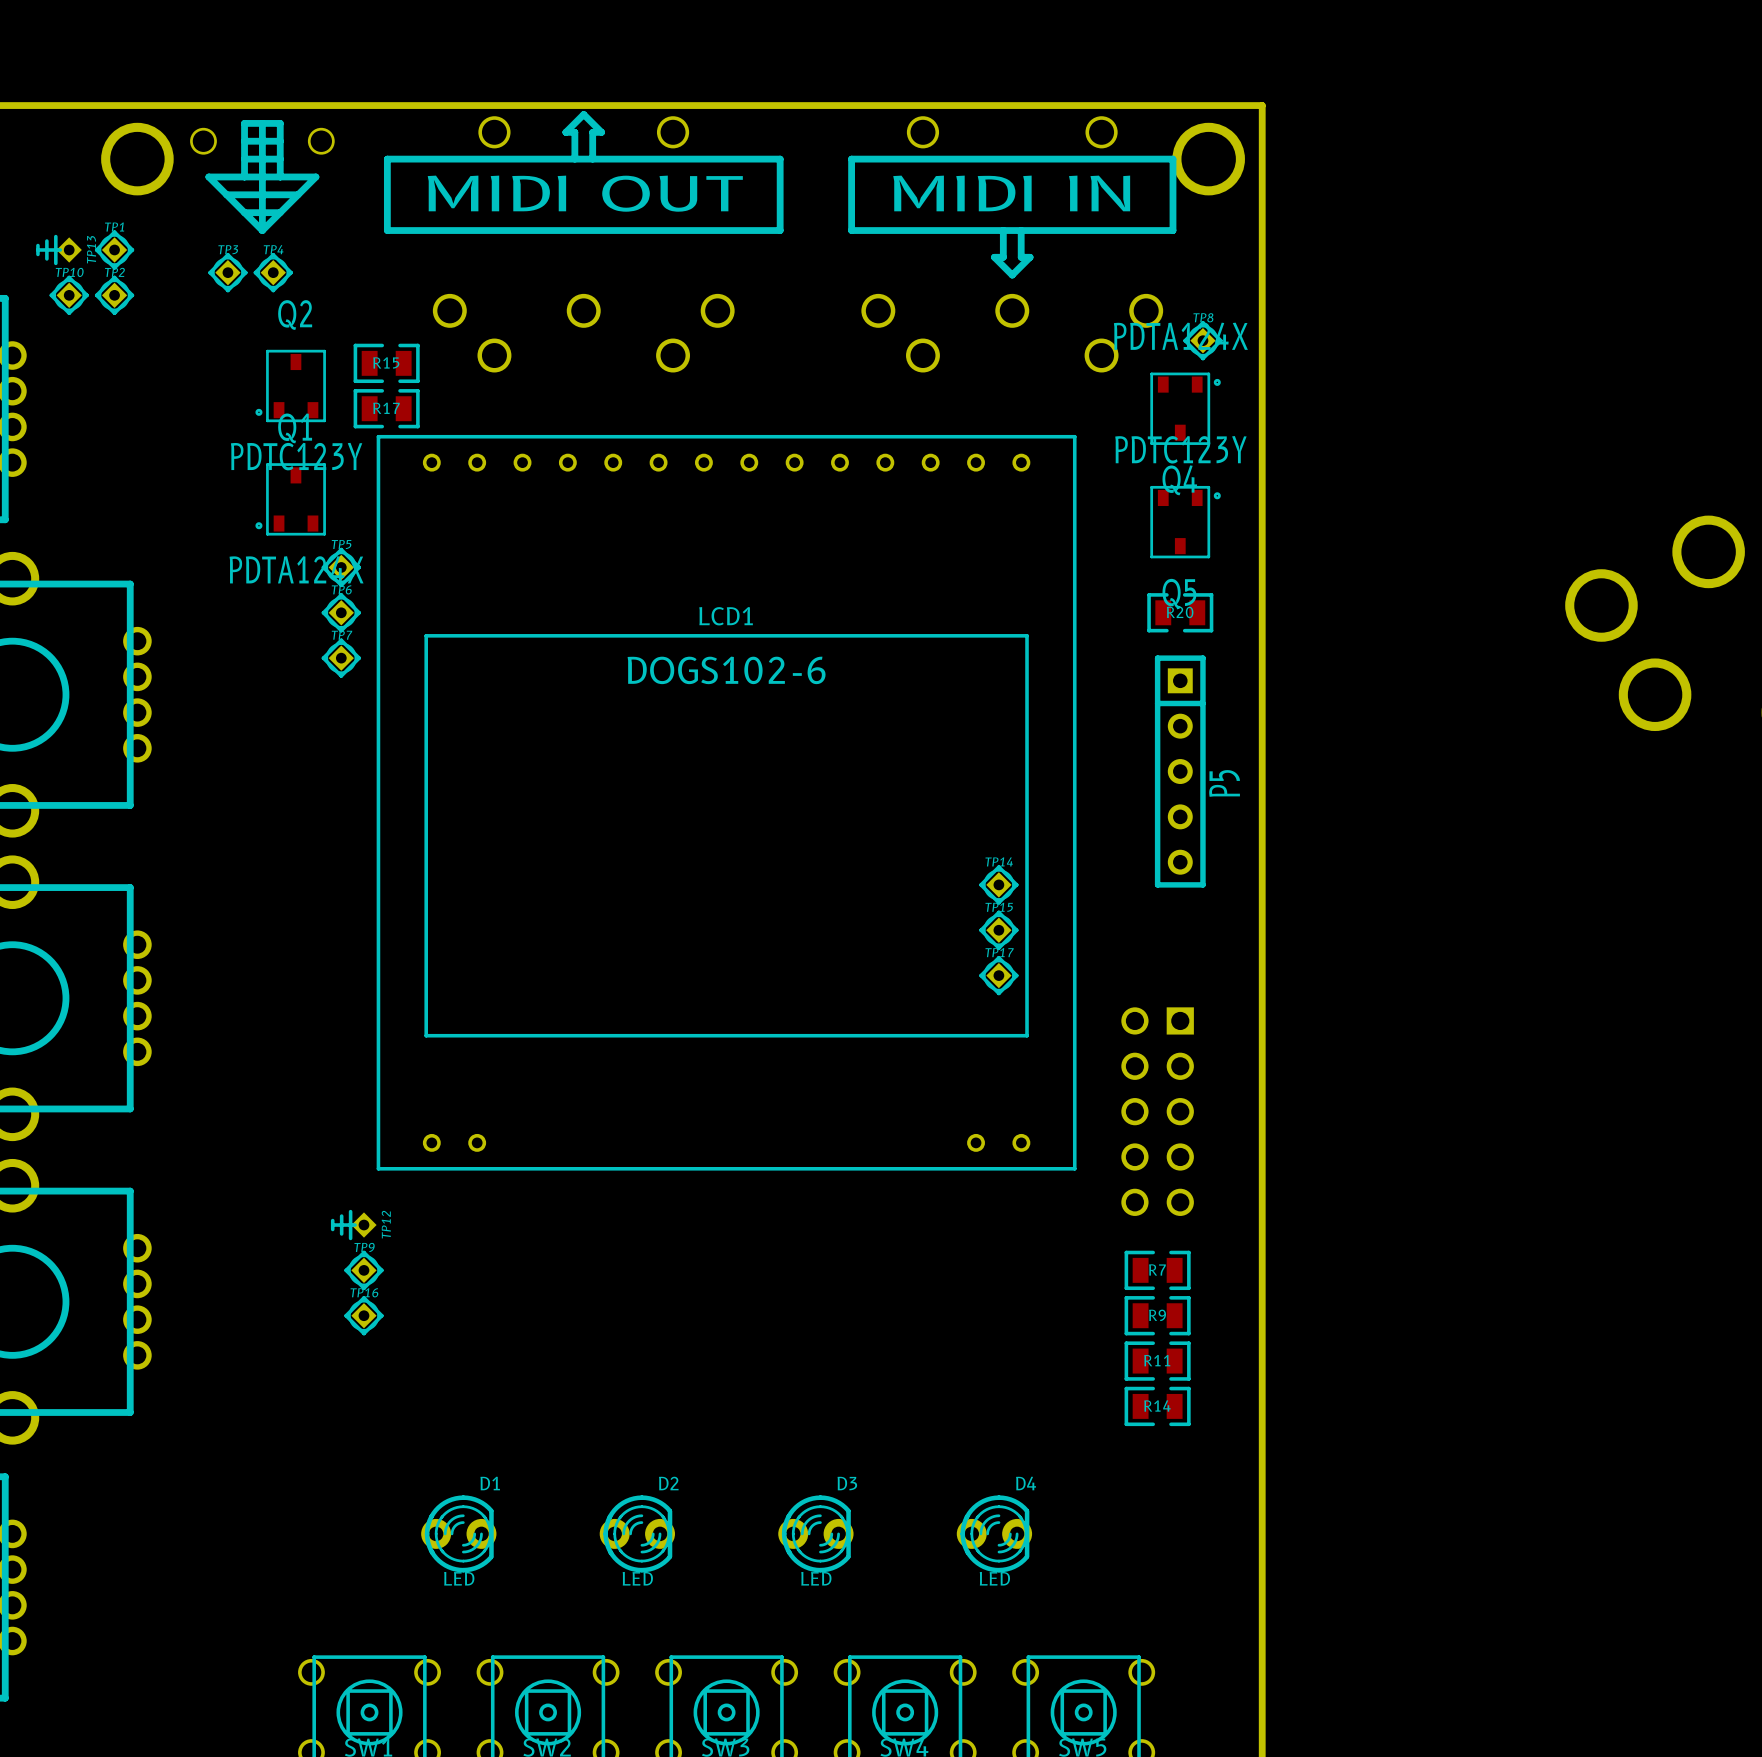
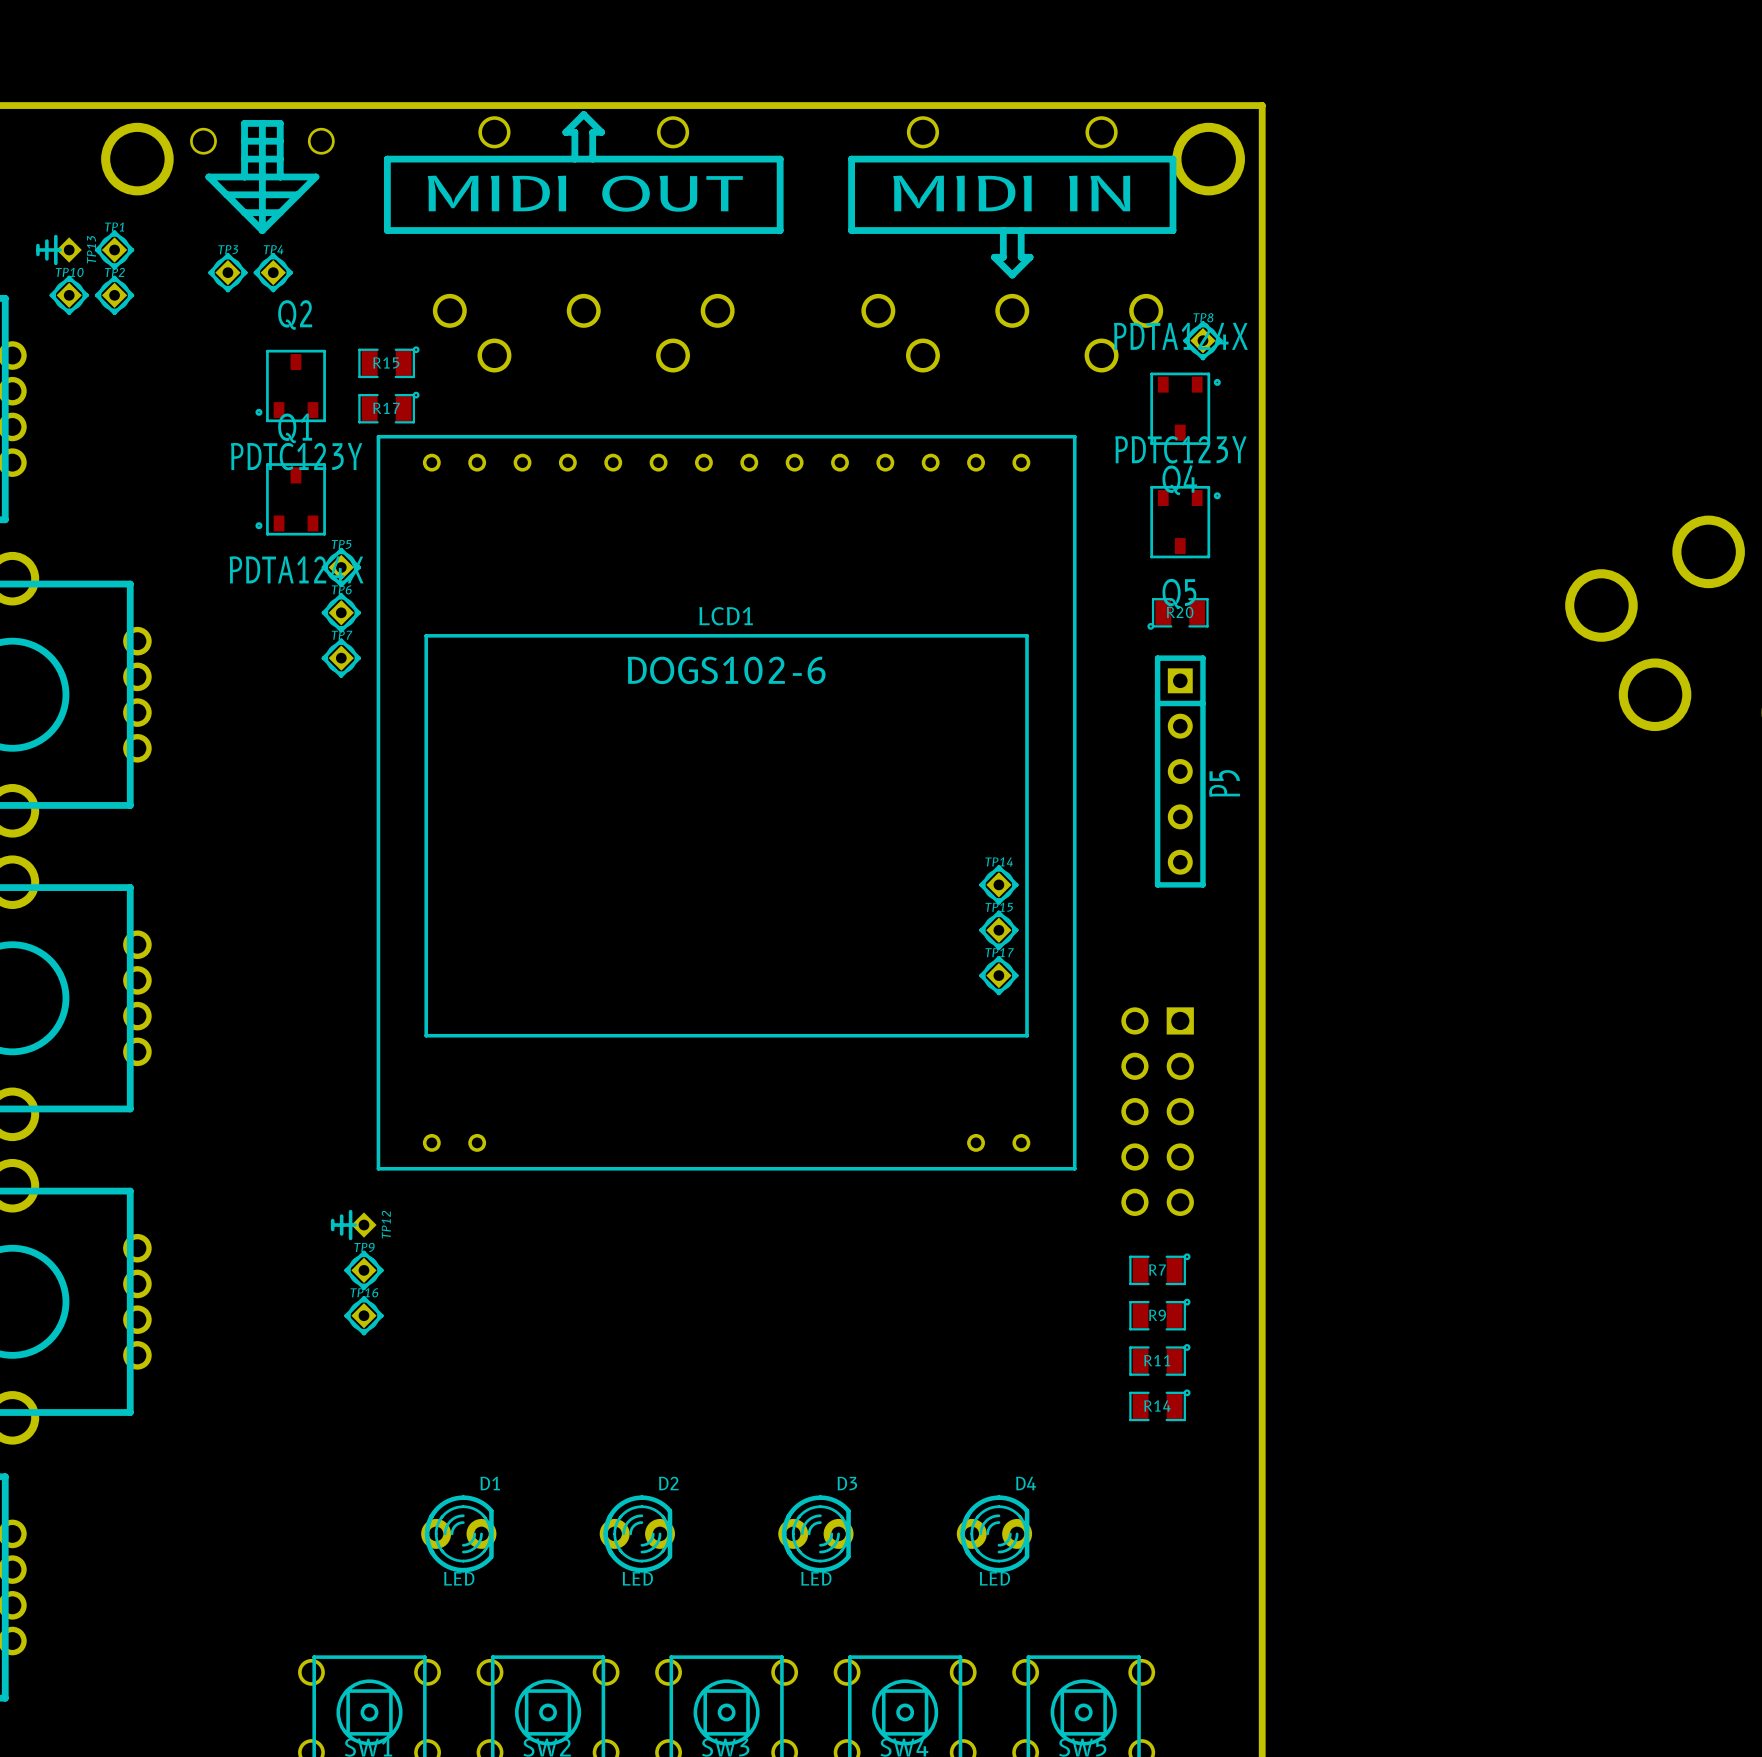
R15 footprint: [353, 343, 420, 384] -> [358, 346, 420, 379]
R17 footprint: [353, 389, 420, 429] -> [358, 391, 420, 424]
R20 footprint: [1147, 593, 1214, 633] -> [1147, 598, 1209, 630]
R7 footprint: [1124, 1250, 1191, 1291] -> [1129, 1253, 1191, 1286]
R9 footprint: [1124, 1296, 1191, 1336] -> [1129, 1298, 1191, 1331]
R11 footprint: [1124, 1341, 1191, 1381] -> [1129, 1344, 1191, 1376]
R14 footprint: [1124, 1386, 1191, 1427] -> [1129, 1389, 1191, 1422]

